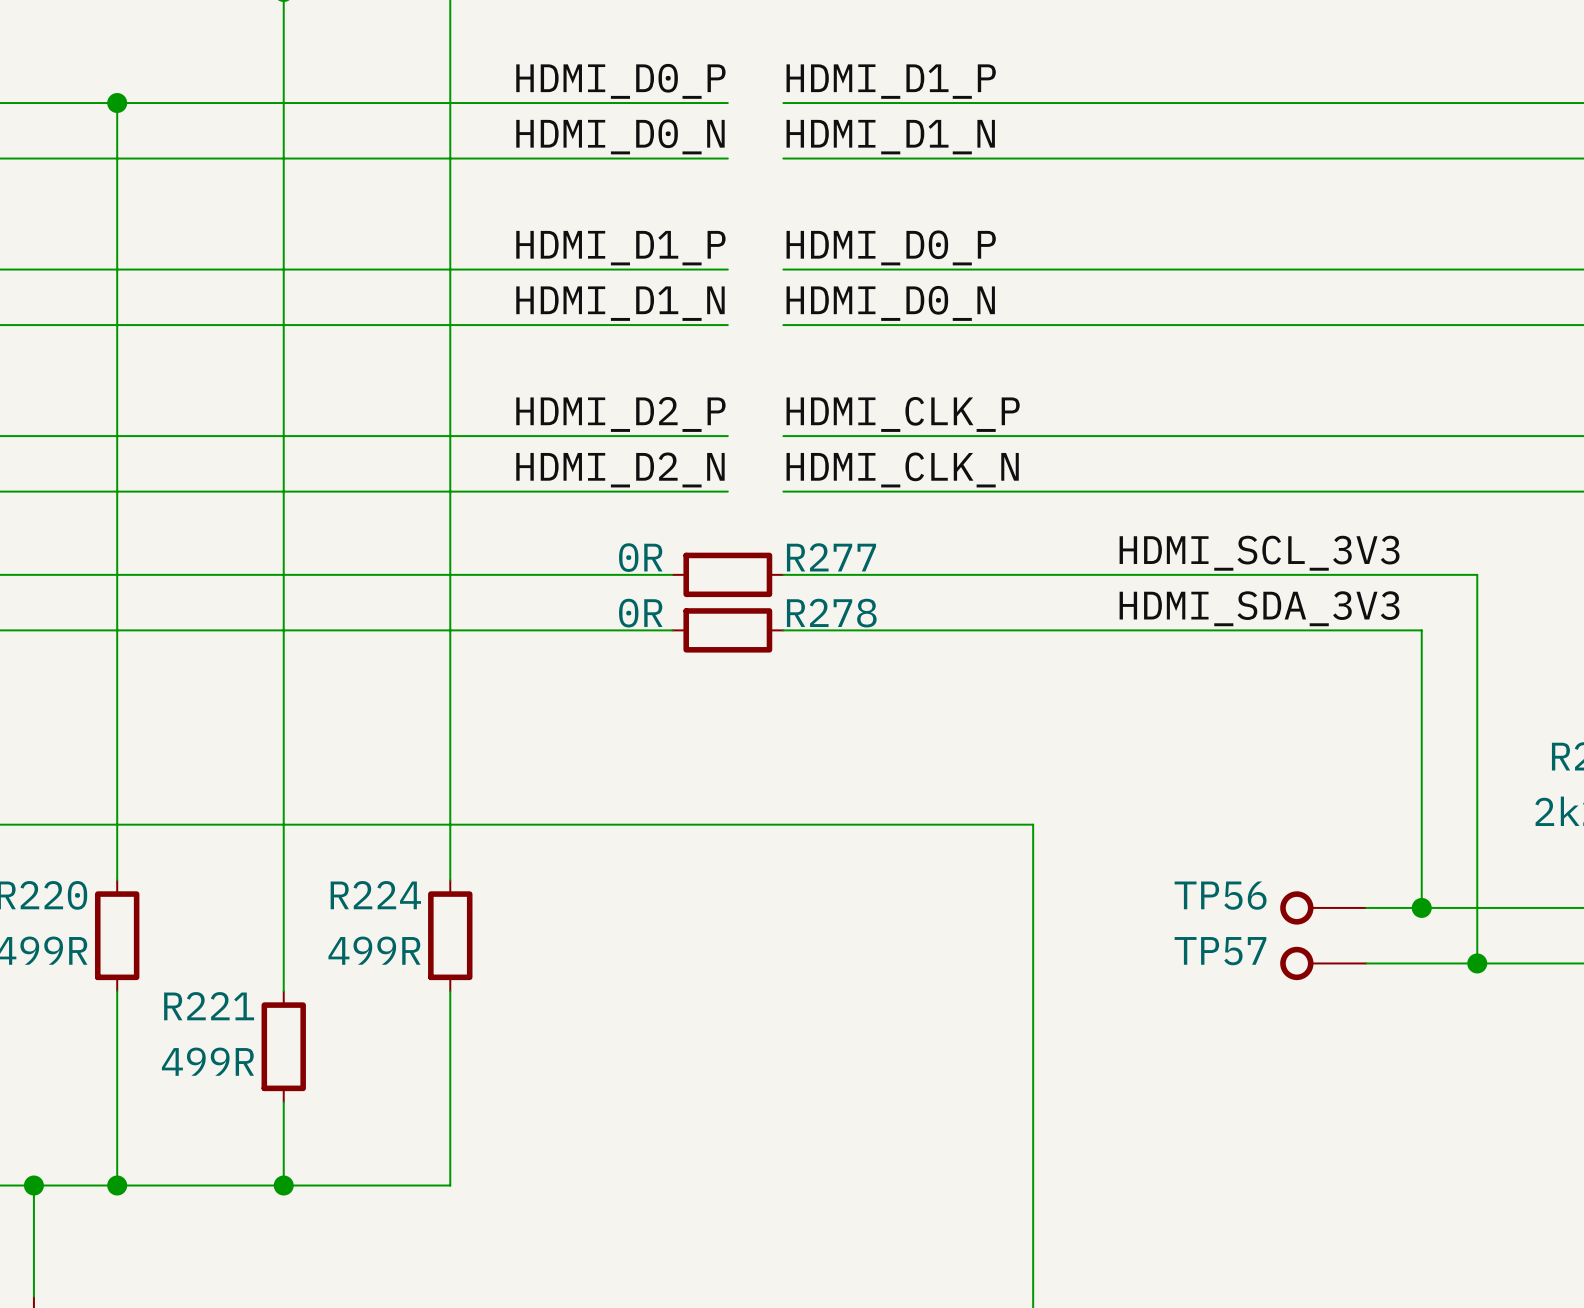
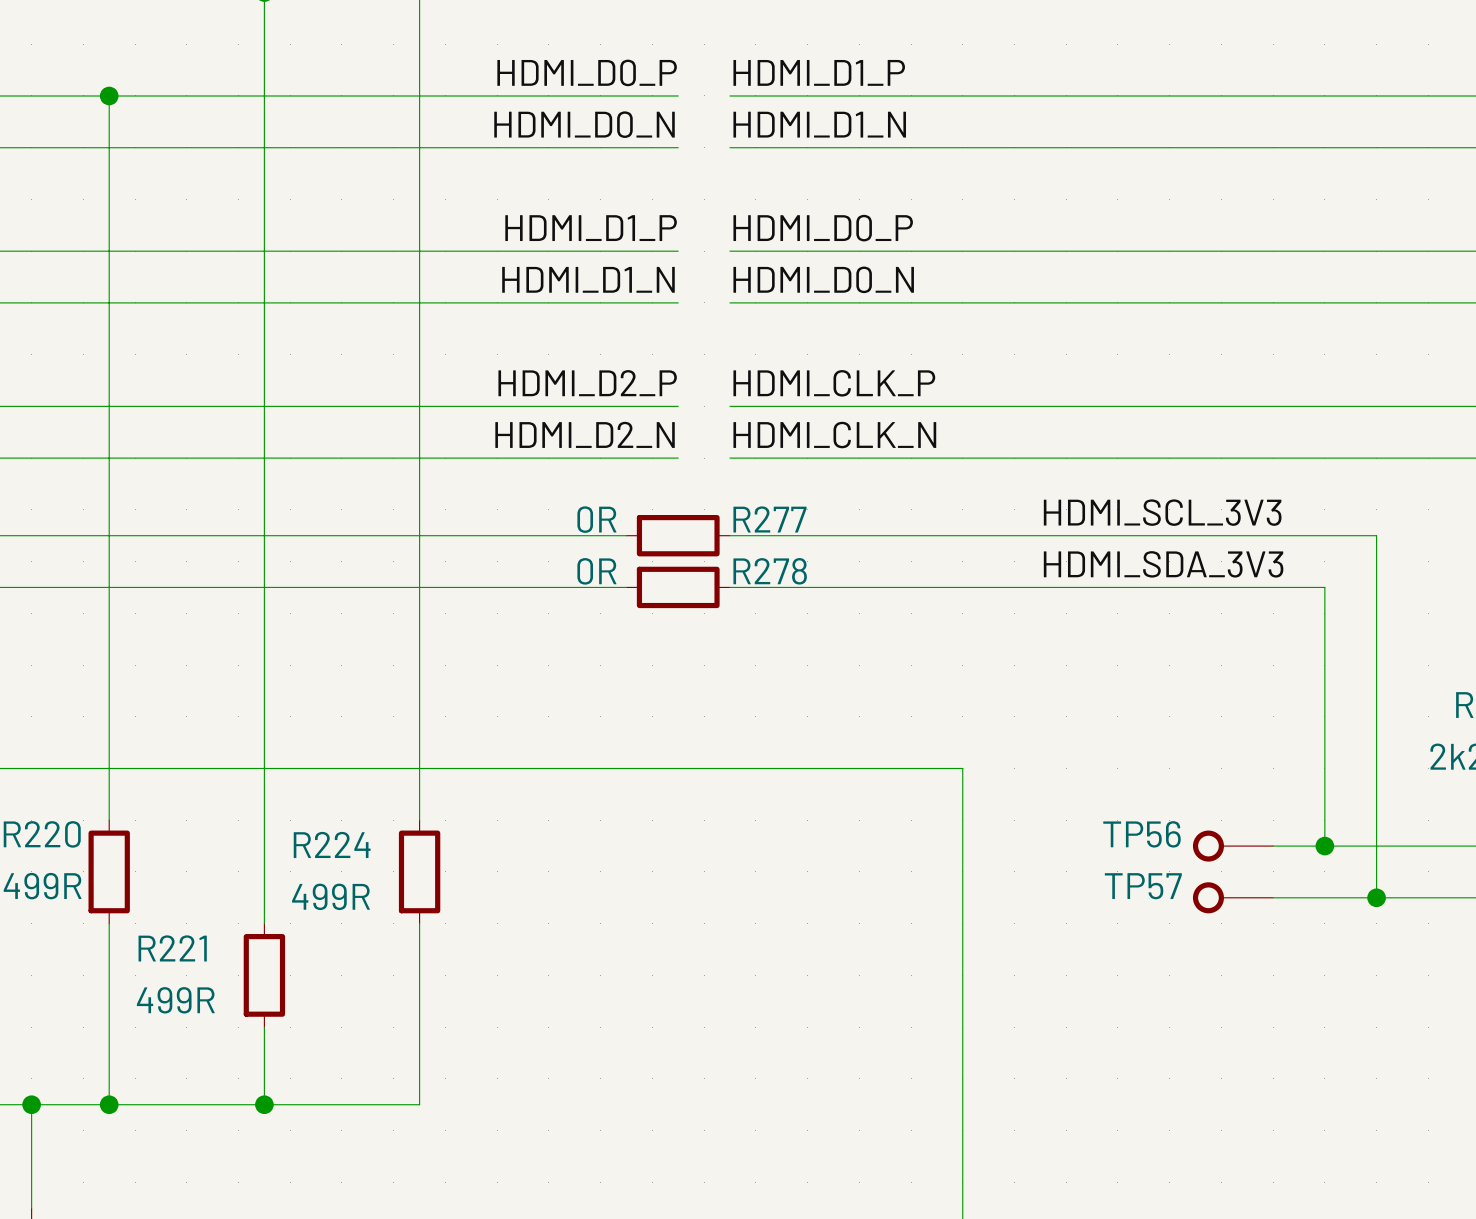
R224 name position: R224 (375, 895) -> R224 (332, 844)
R224 text position: 499R (374, 950) -> 499R (331, 896)
R221 name position: R221 (209, 1006) -> R221 (172, 948)
R221 text position: 499R (207, 1061) -> 499R (175, 1000)

